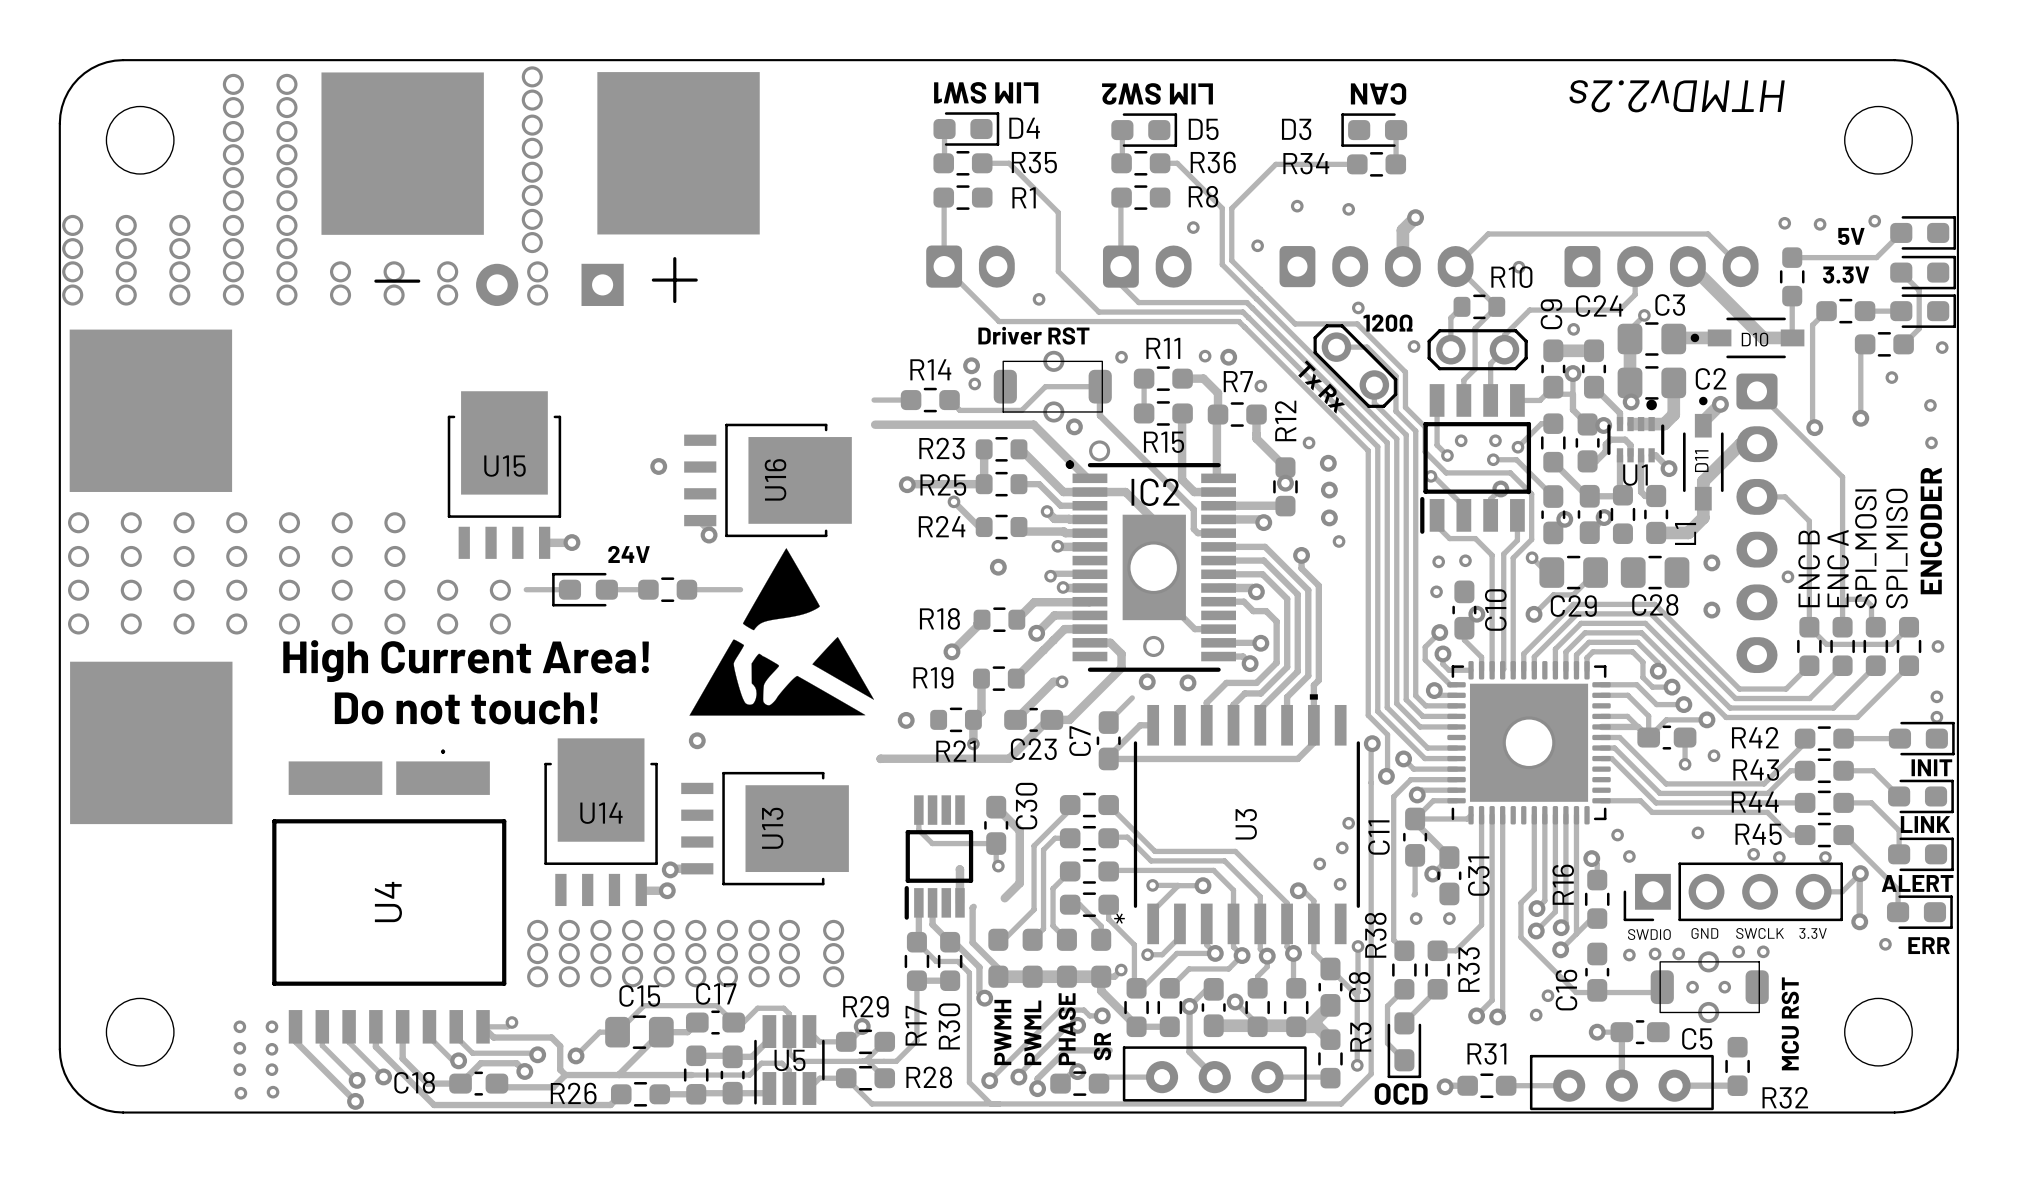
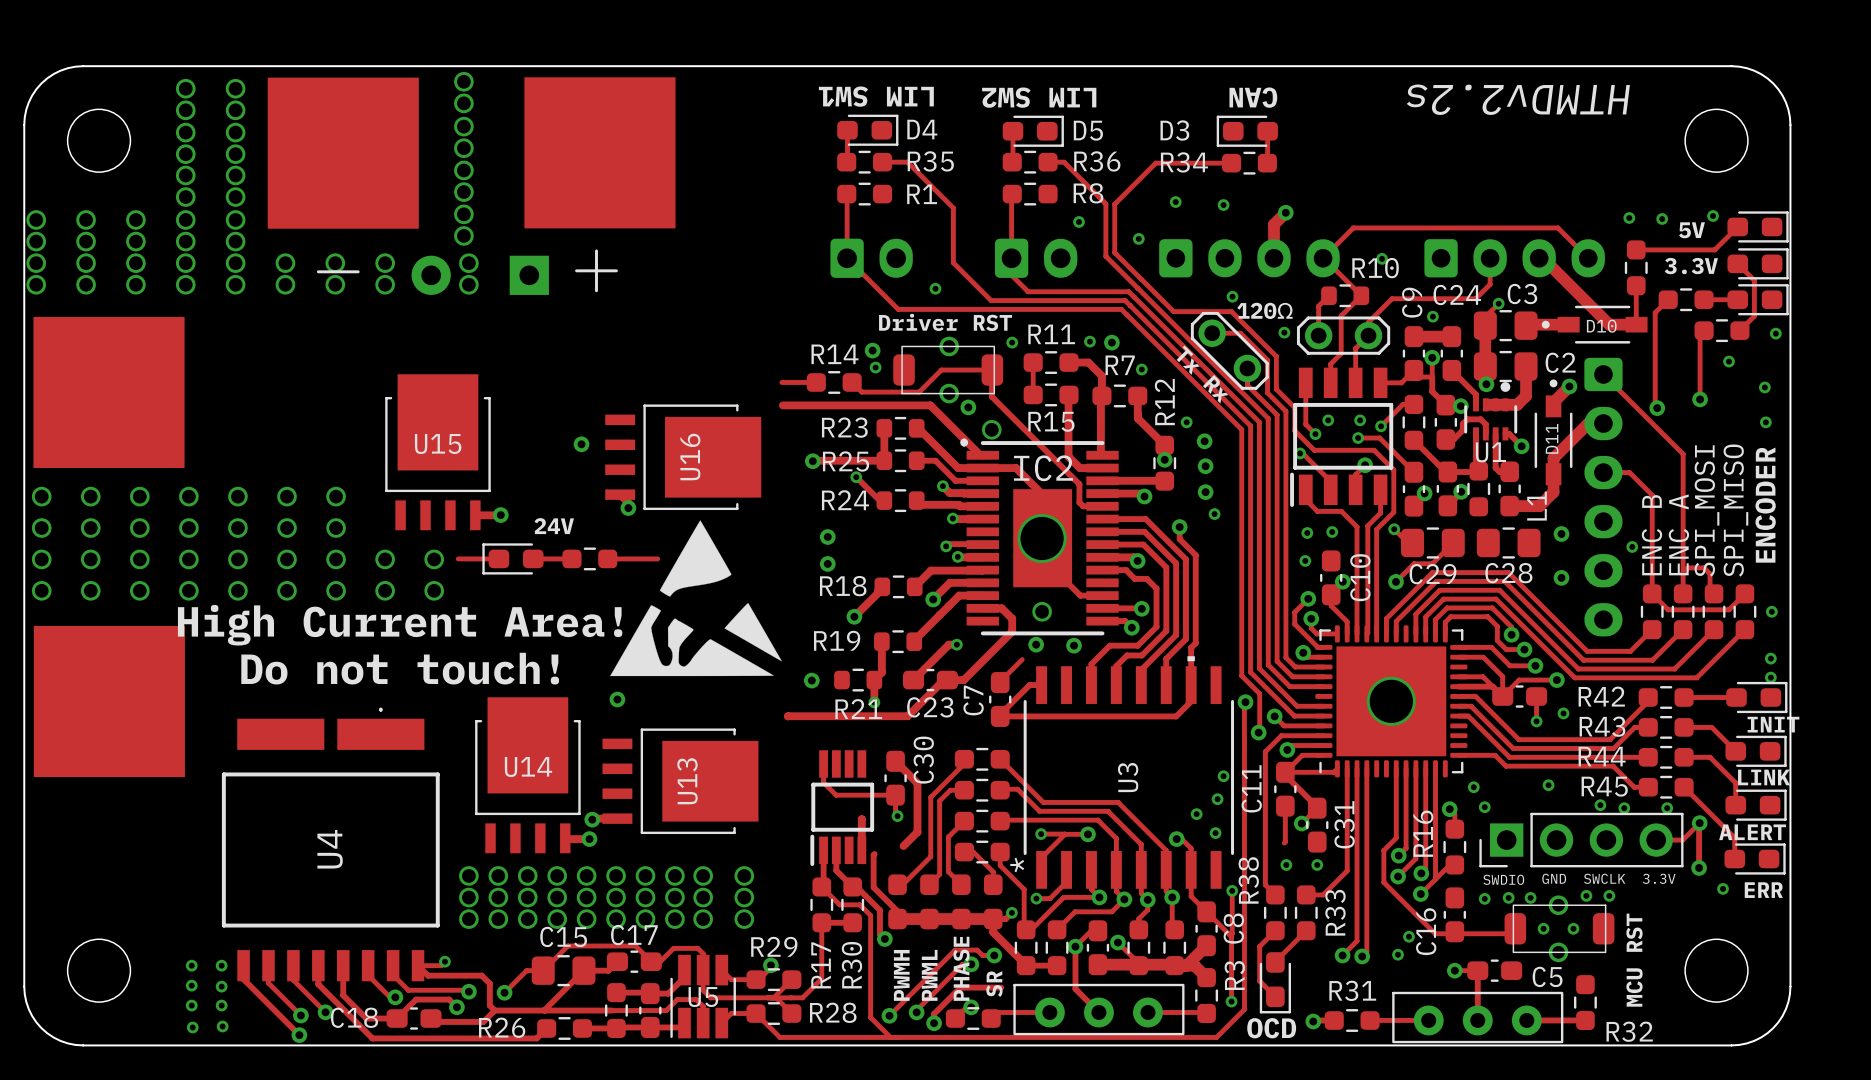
via: none -> (827, 537)
via: (998, 567) -> none
via: none -> (827, 563)

